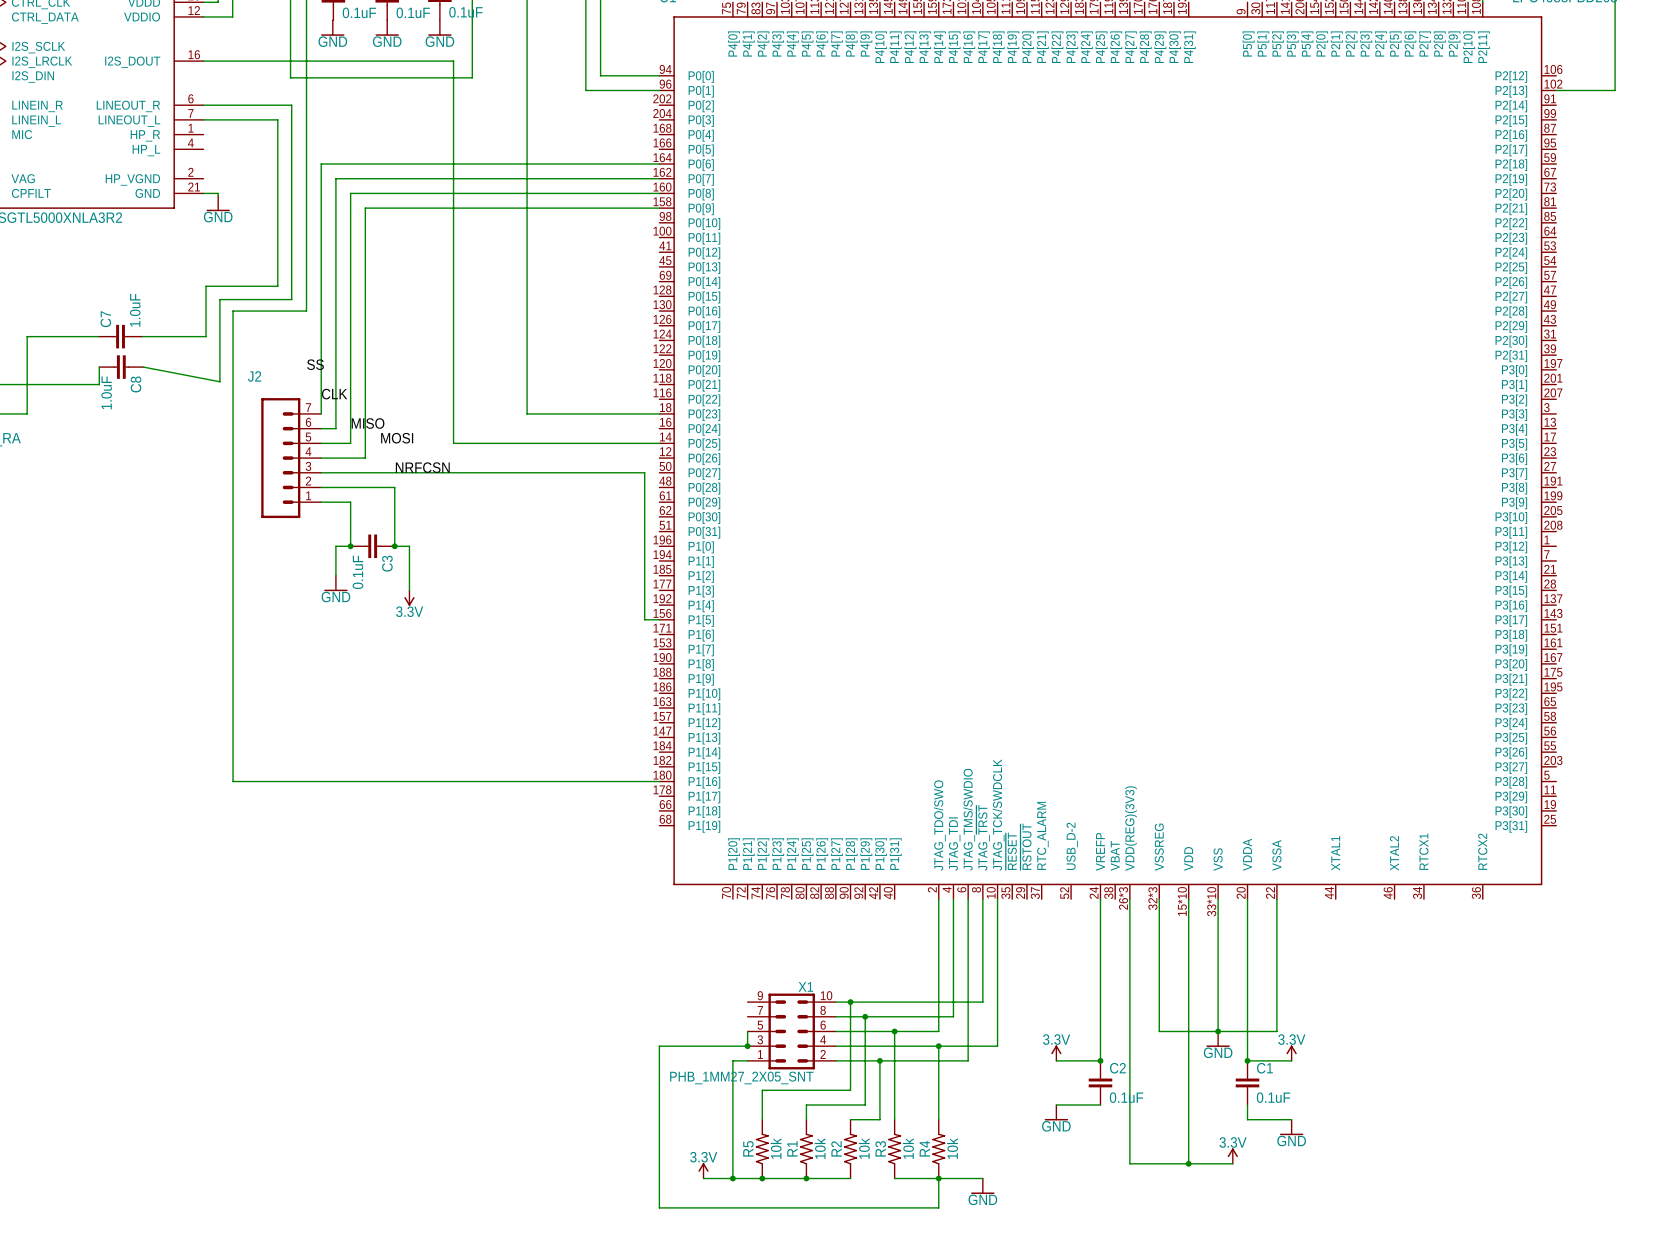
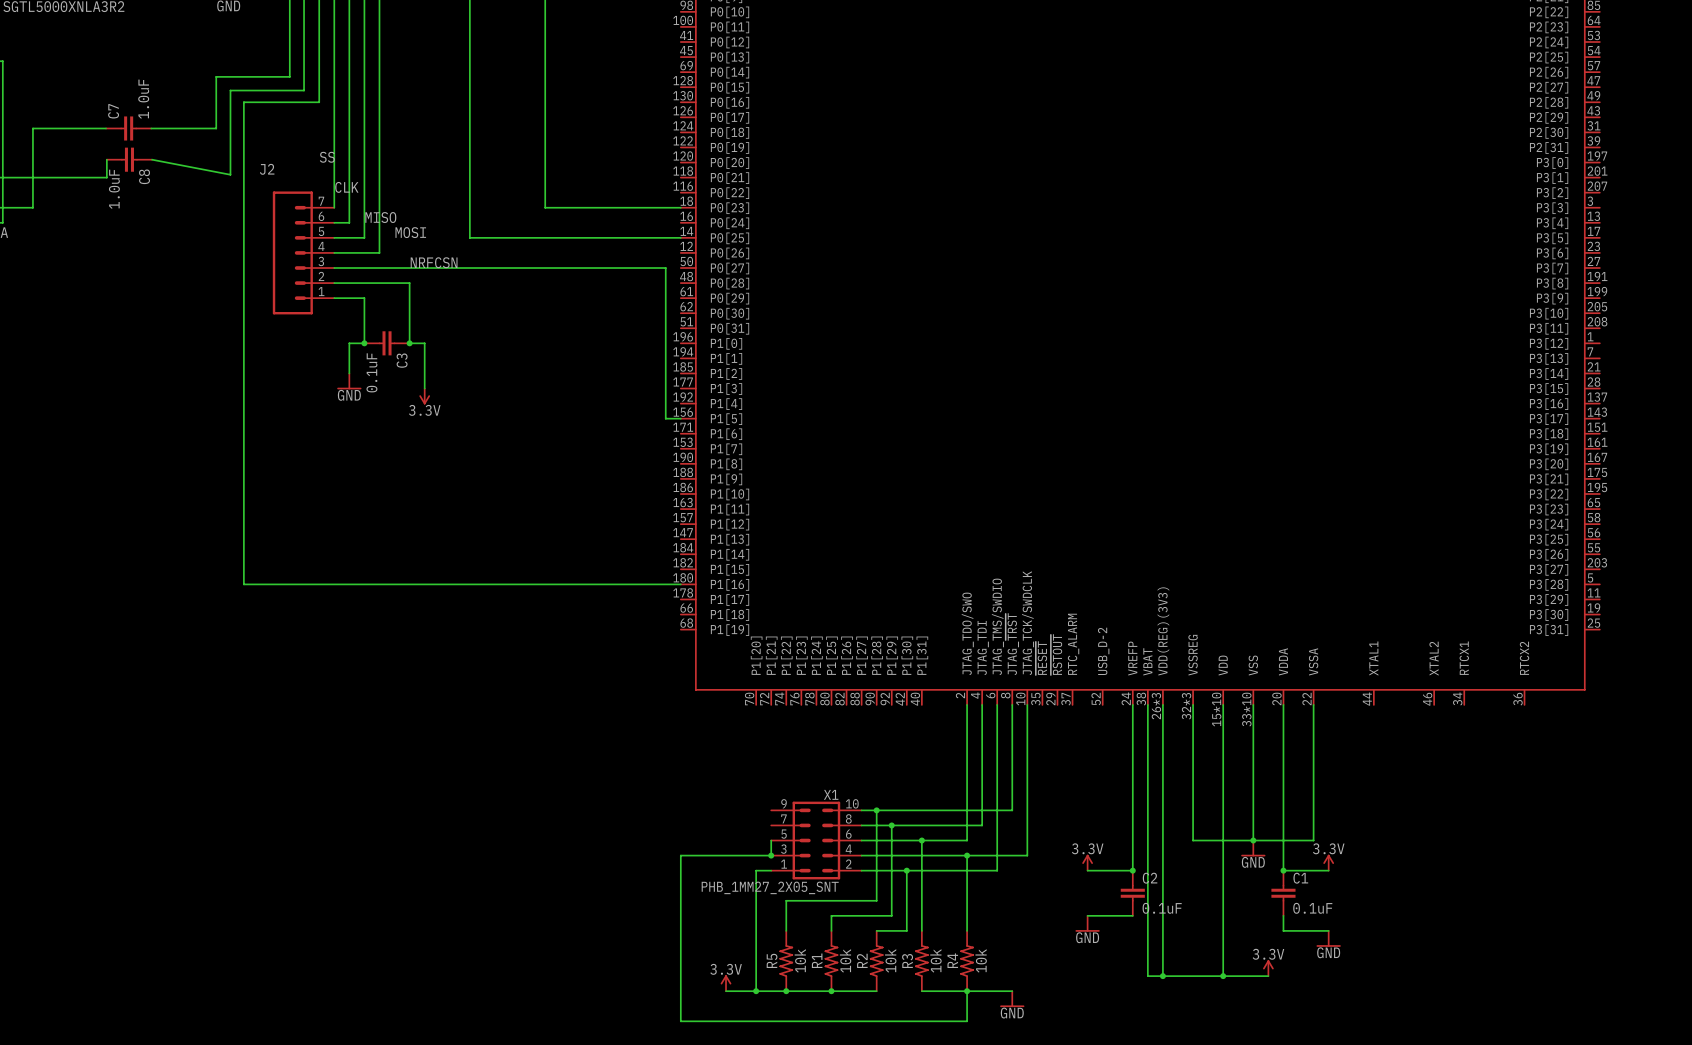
wire: none -> (1147, 704) (1147, 976) (1162, 976)
junction: none -> (1162, 976)

